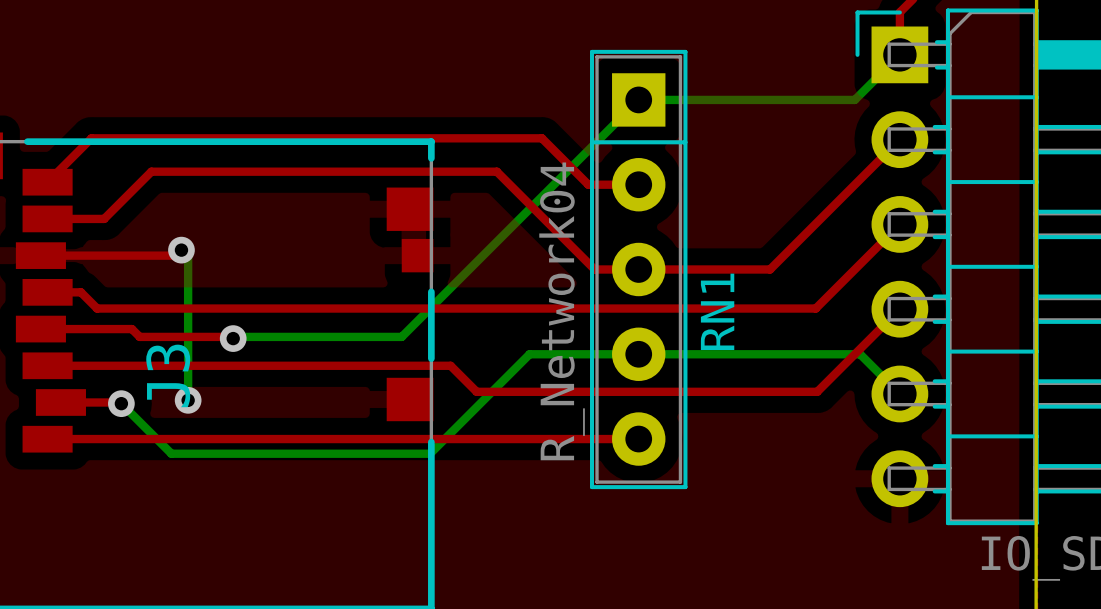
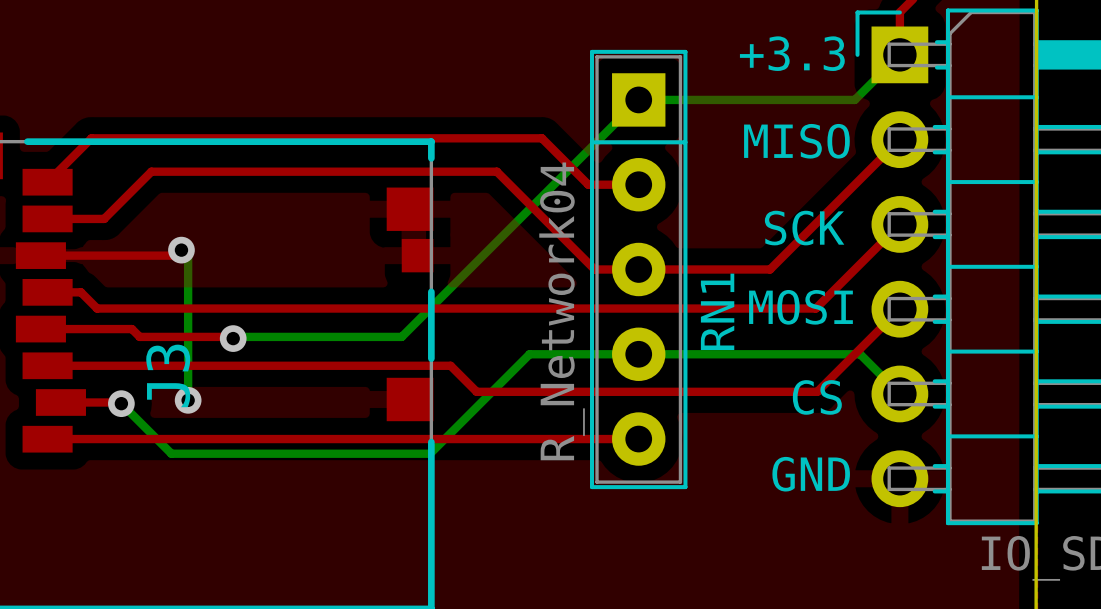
text: none -> +3.3 (792, 53)
text: none -> MISO (796, 141)
text: none -> SCK (804, 228)
text: none -> MOSI (800, 307)
text: none -> CS (817, 397)
text: none -> GND (811, 474)

